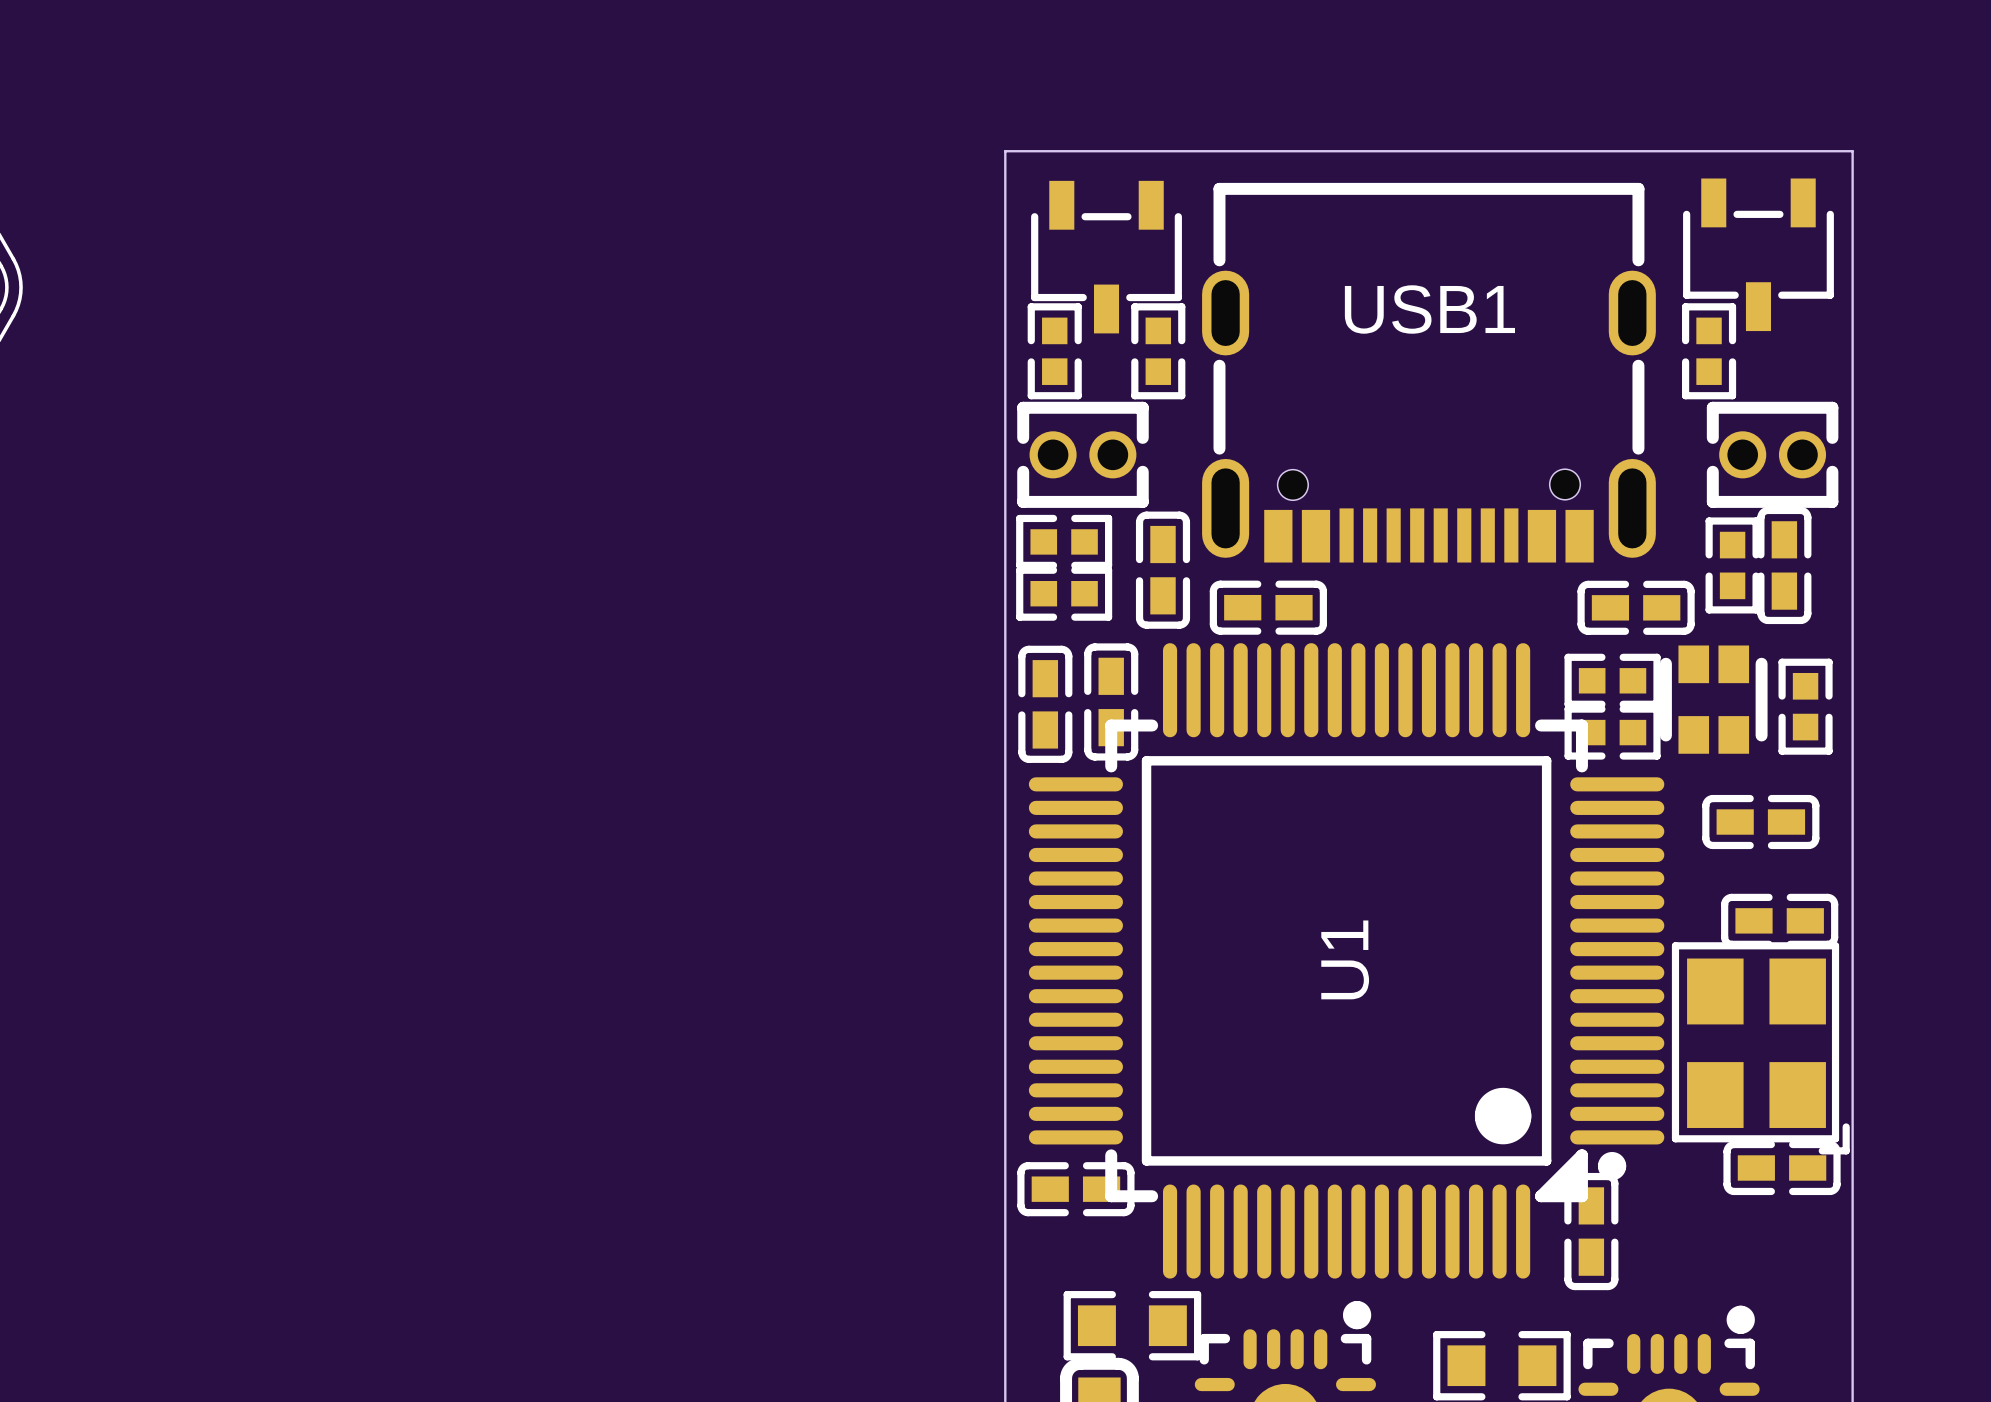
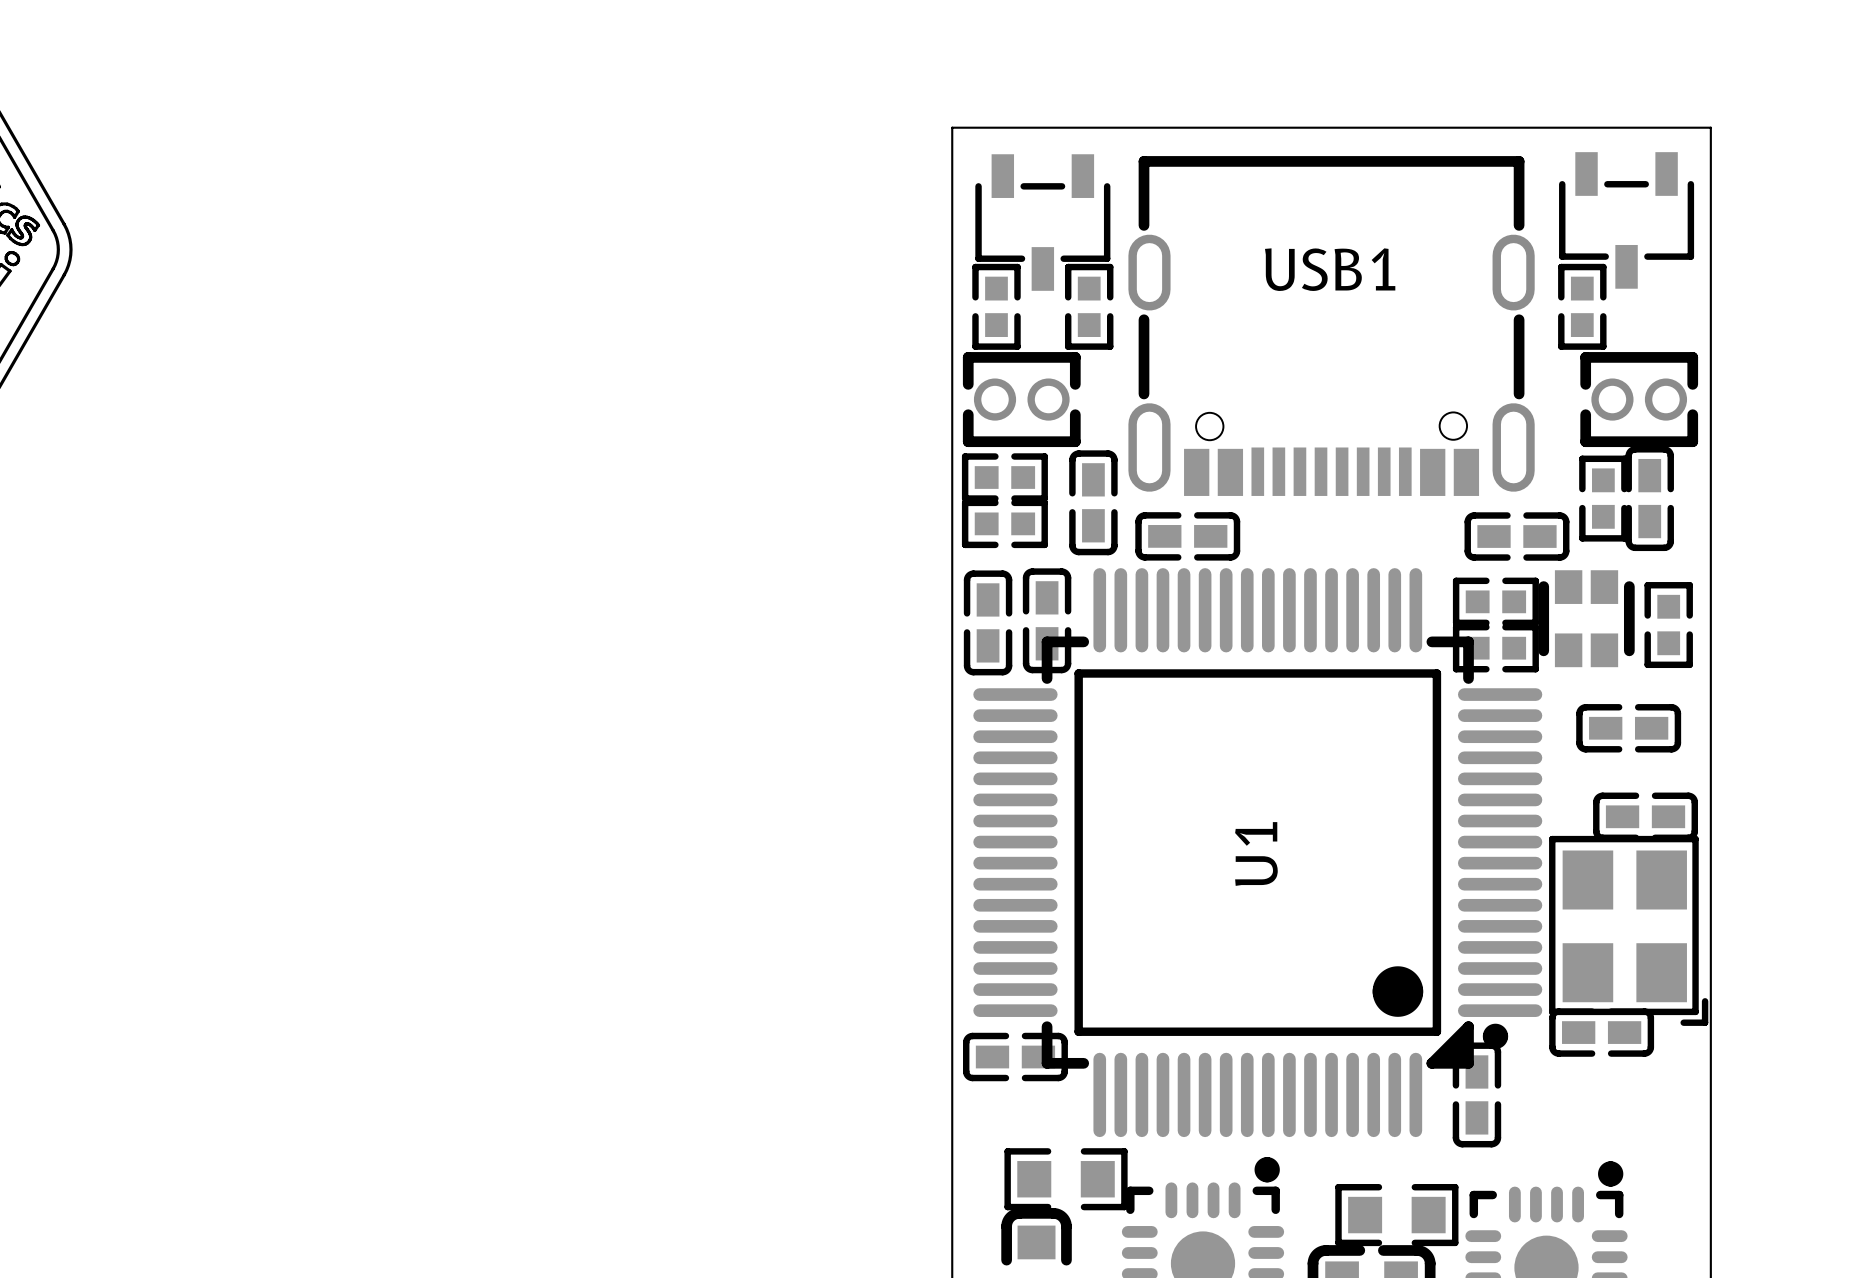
part position: (1782, 1168) -> (1601, 1032)

